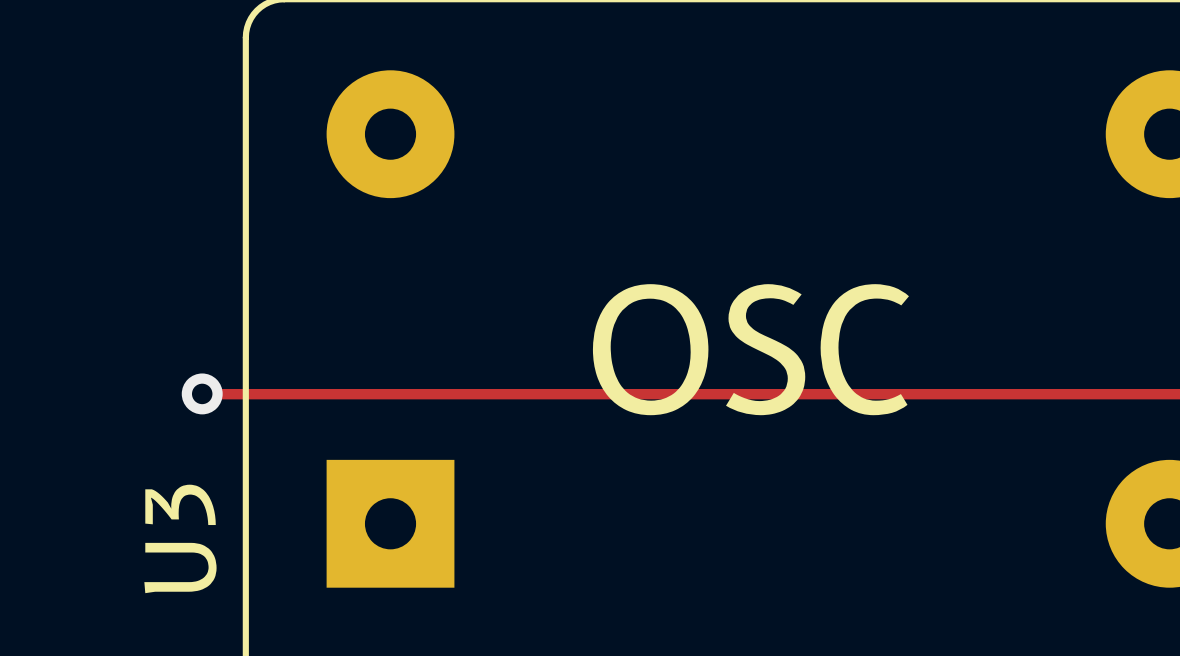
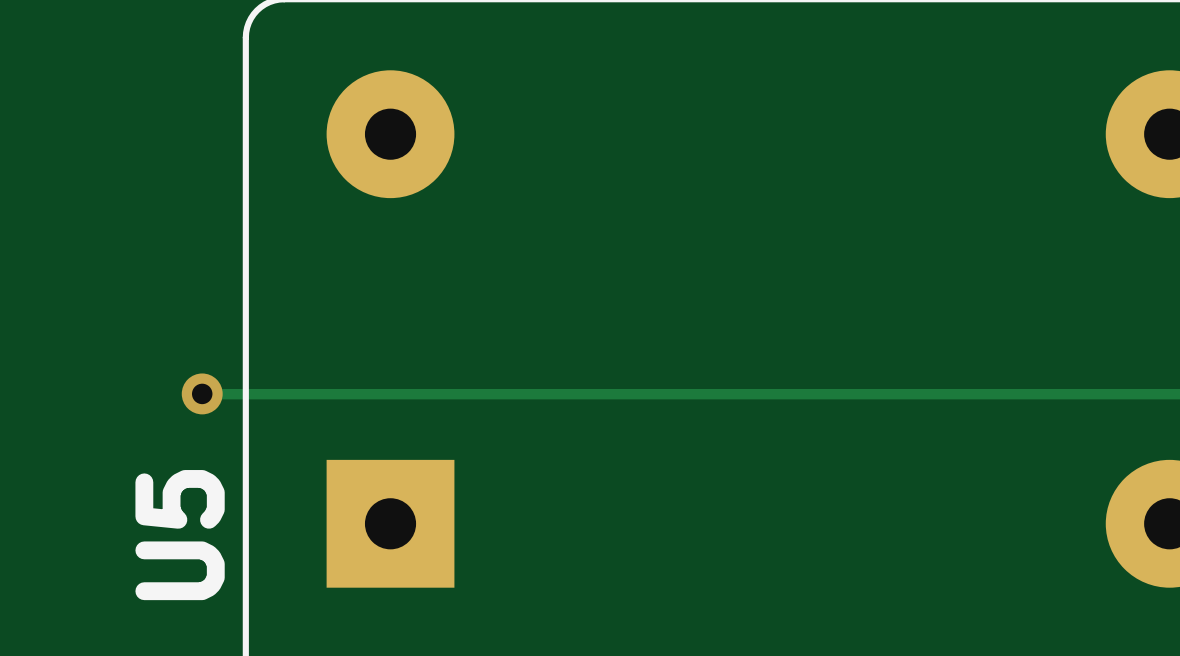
text: OSC (750, 349) -> none
U3 name: U3 (180, 538) -> U5 (180, 535)

